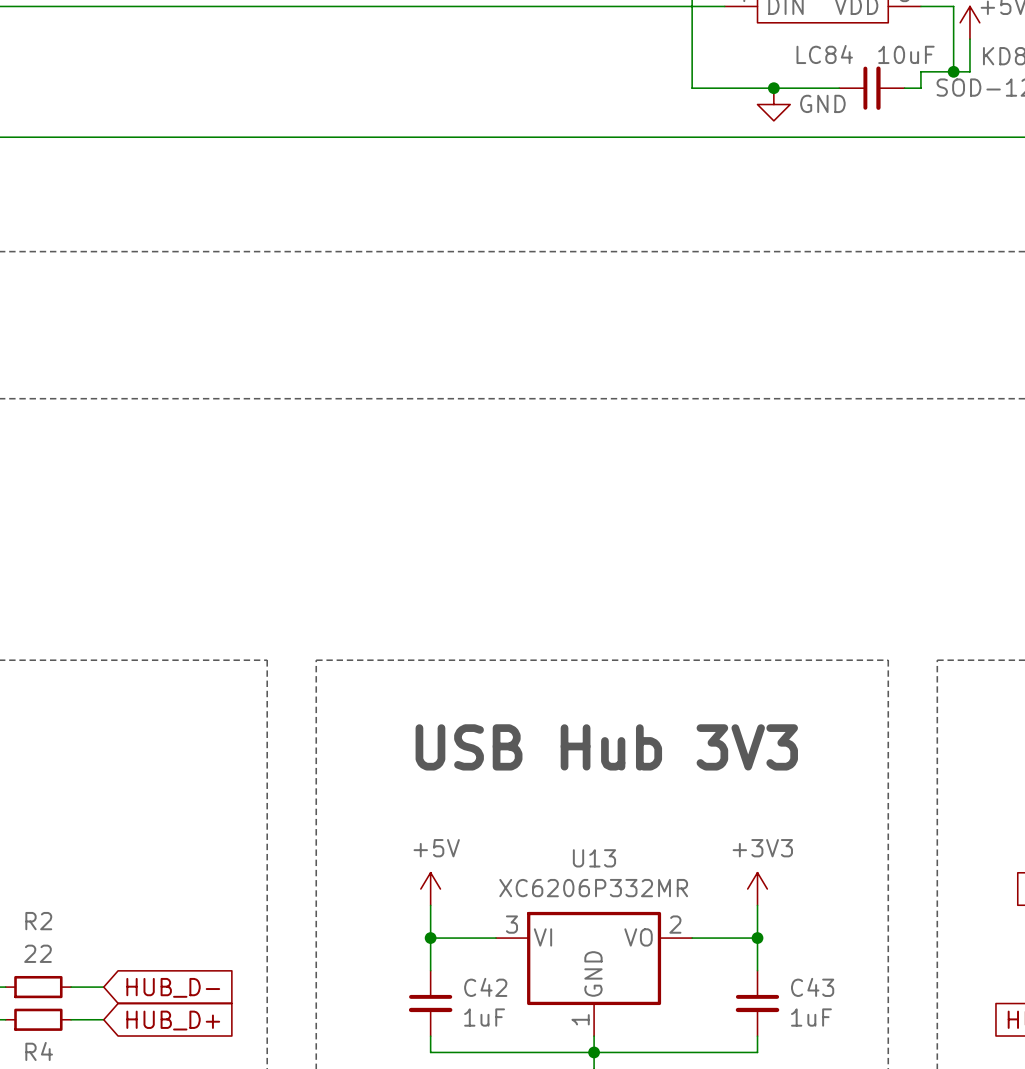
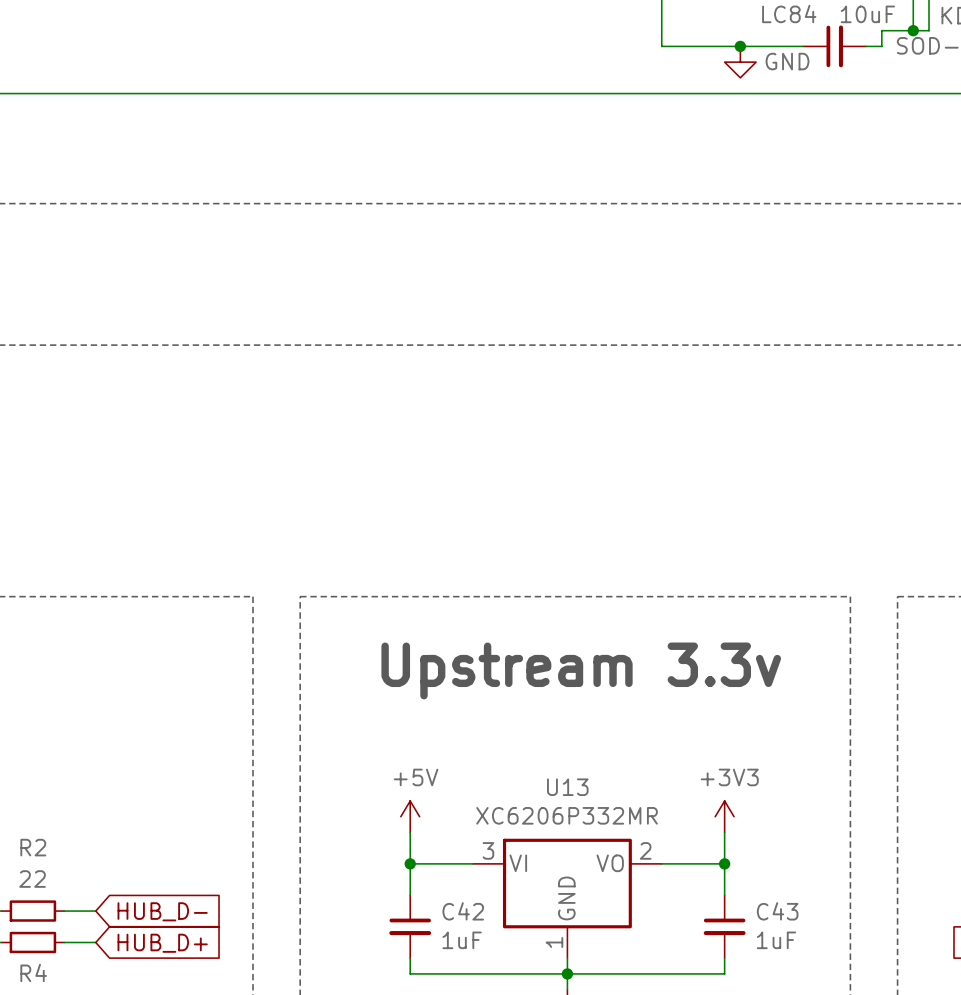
text: none -> Upstream 3.3v (581, 670)
text: USB Hub 3V3 (606, 747) -> none

